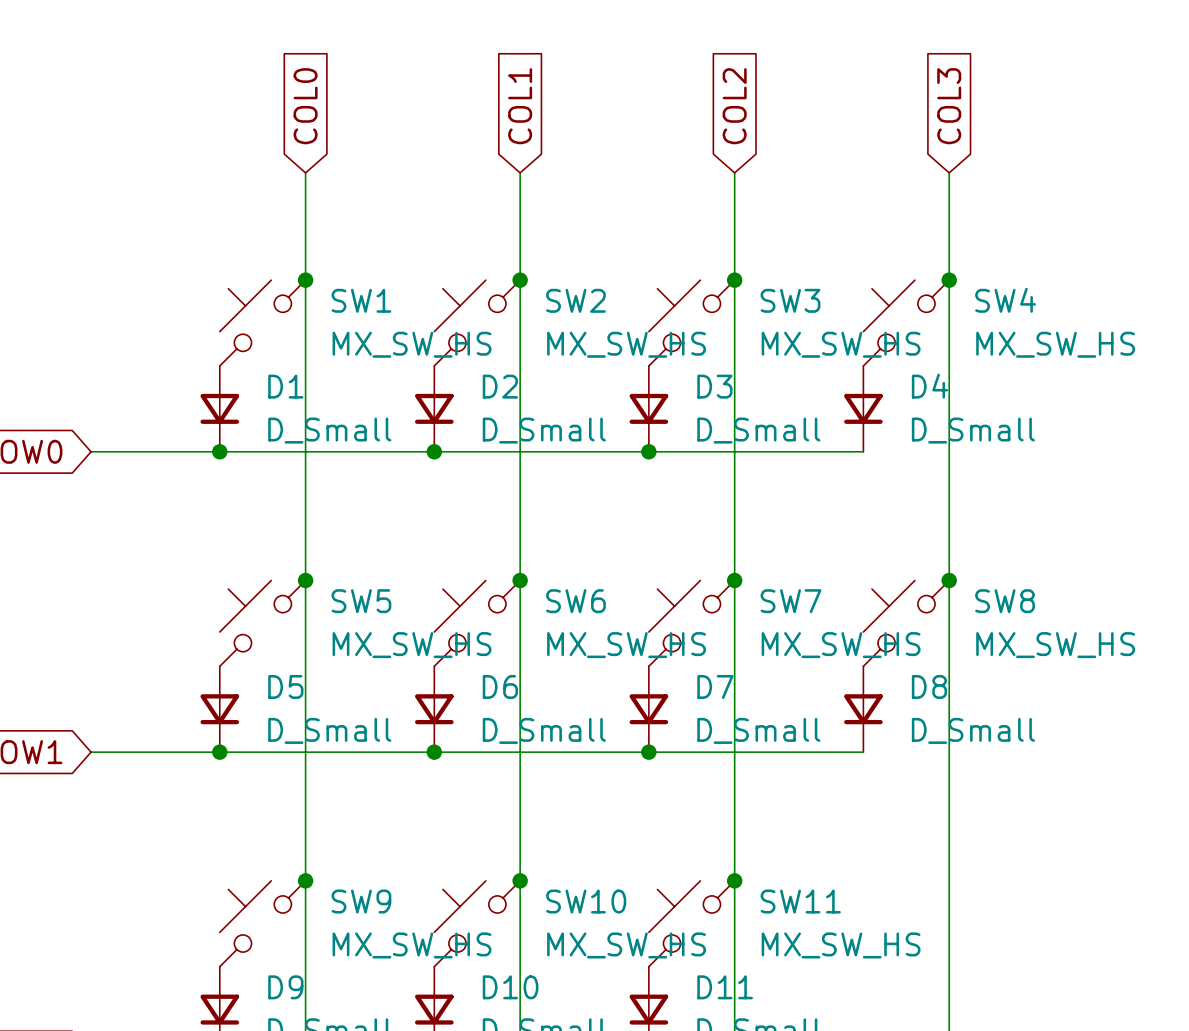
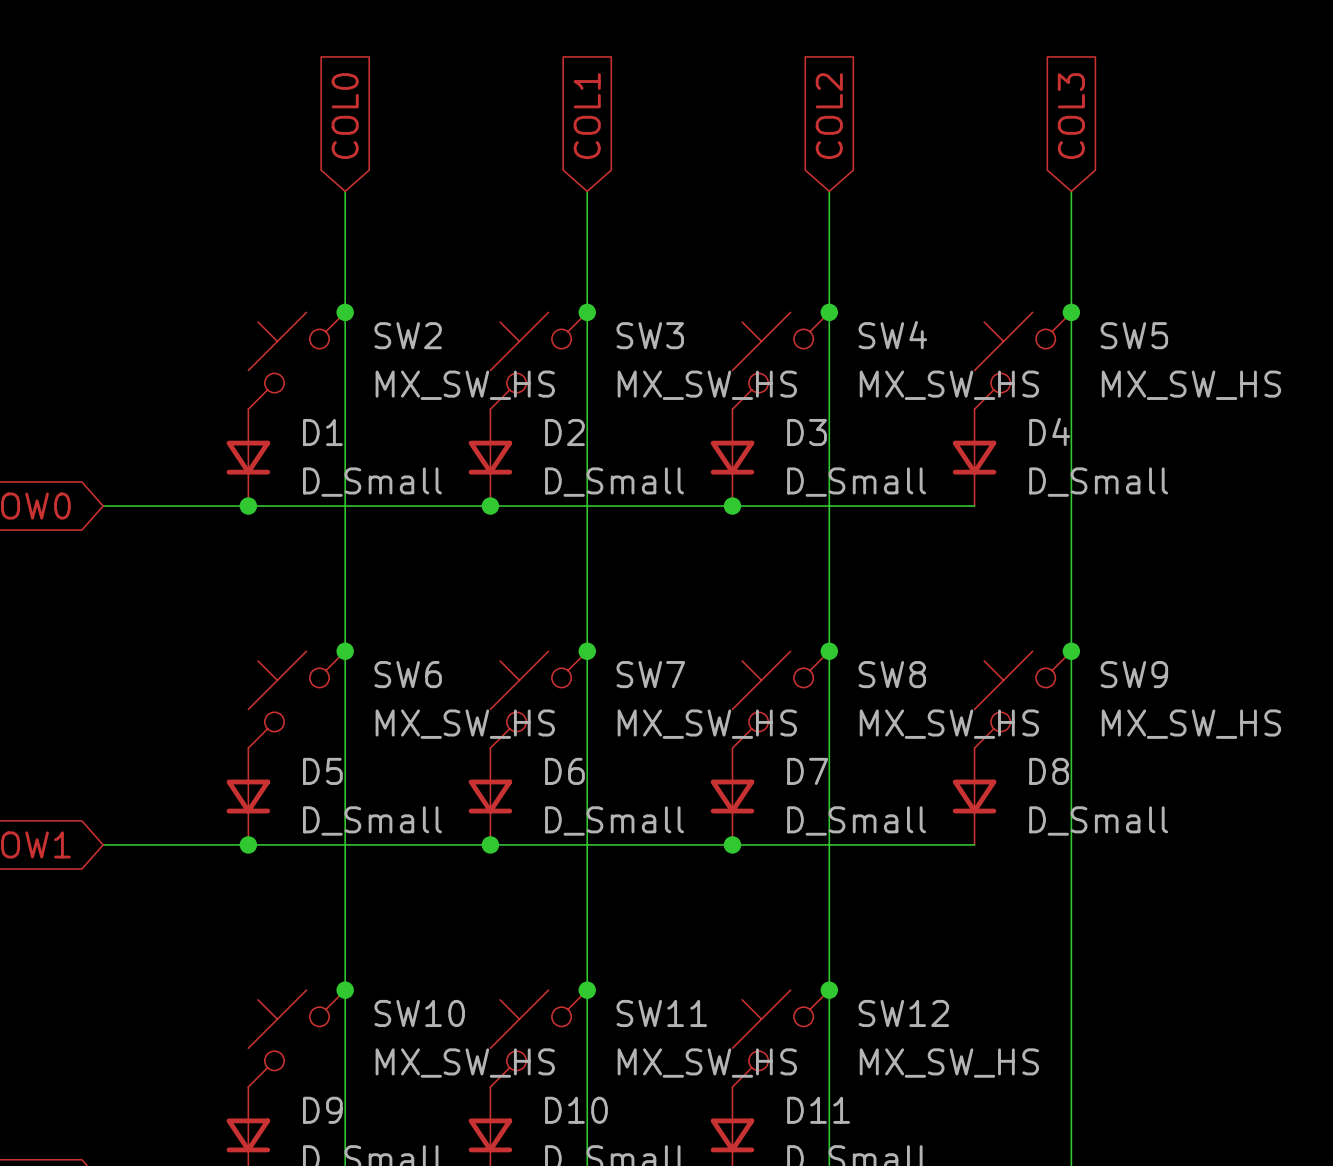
SW1 name: SW1 (361, 300) -> SW2 (408, 335)
SW2 name: SW2 (575, 300) -> SW3 (650, 335)
SW3 name: SW3 (790, 300) -> SW4 (892, 335)
SW4 name: SW4 (1005, 300) -> SW5 (1134, 335)
SW5 name: SW5 (361, 601) -> SW6 (408, 674)
SW6 name: SW6 (575, 601) -> SW7 (650, 674)
SW7 name: SW7 (791, 601) -> SW8 (892, 674)
SW8 name: SW8 (1005, 601) -> SW9 (1134, 674)
SW9 name: SW9 (361, 901) -> SW10 (419, 1013)
SW10 name: SW10 (586, 901) -> SW11 (661, 1013)
SW11 name: SW11 (800, 901) -> SW12 (903, 1013)

